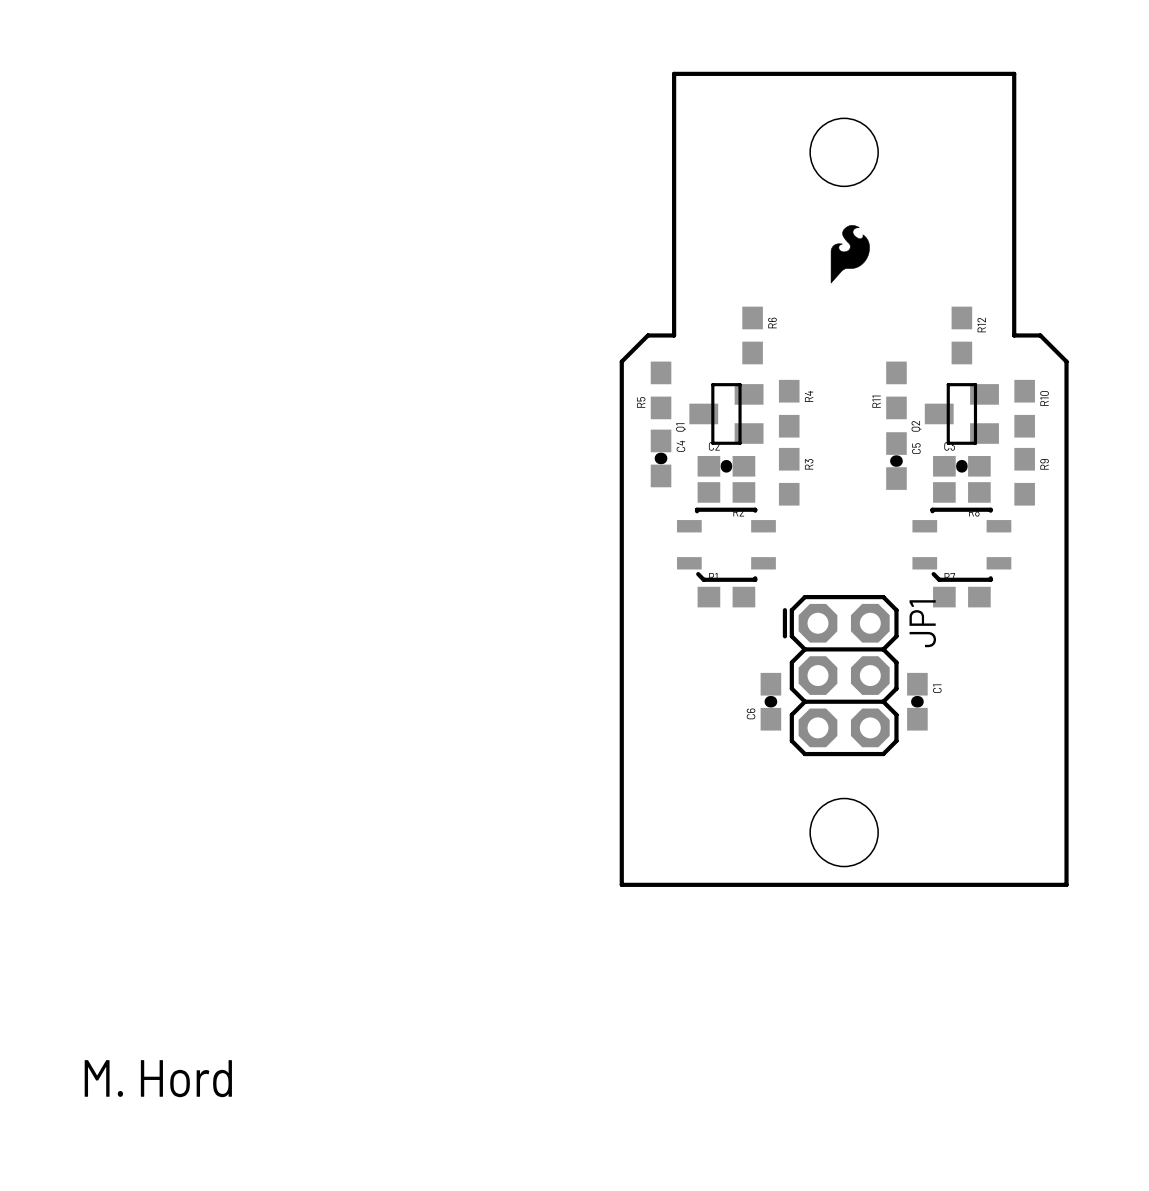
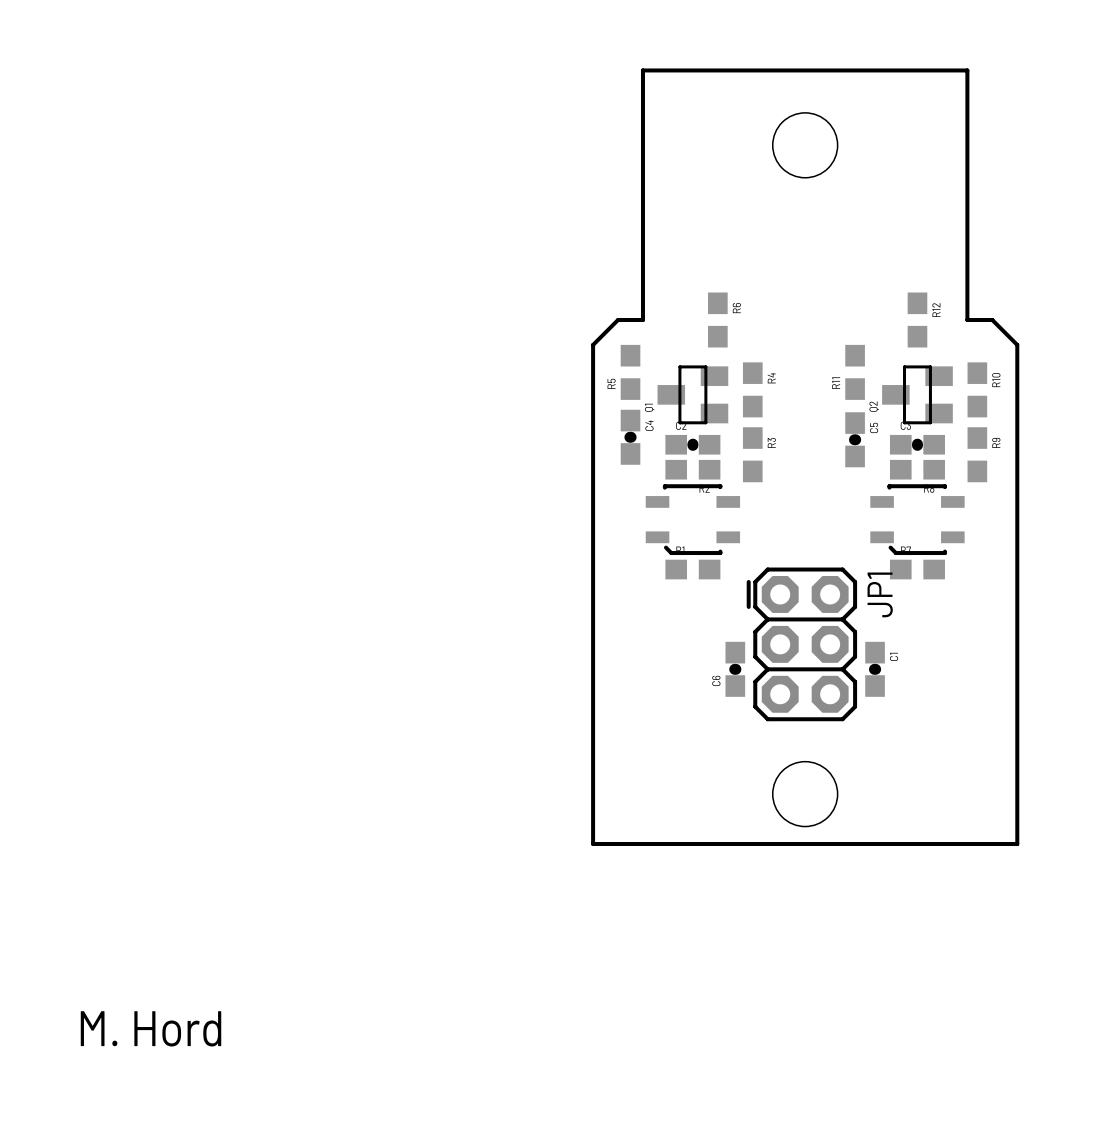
drawing: [830, 225, 870, 284] -> none

